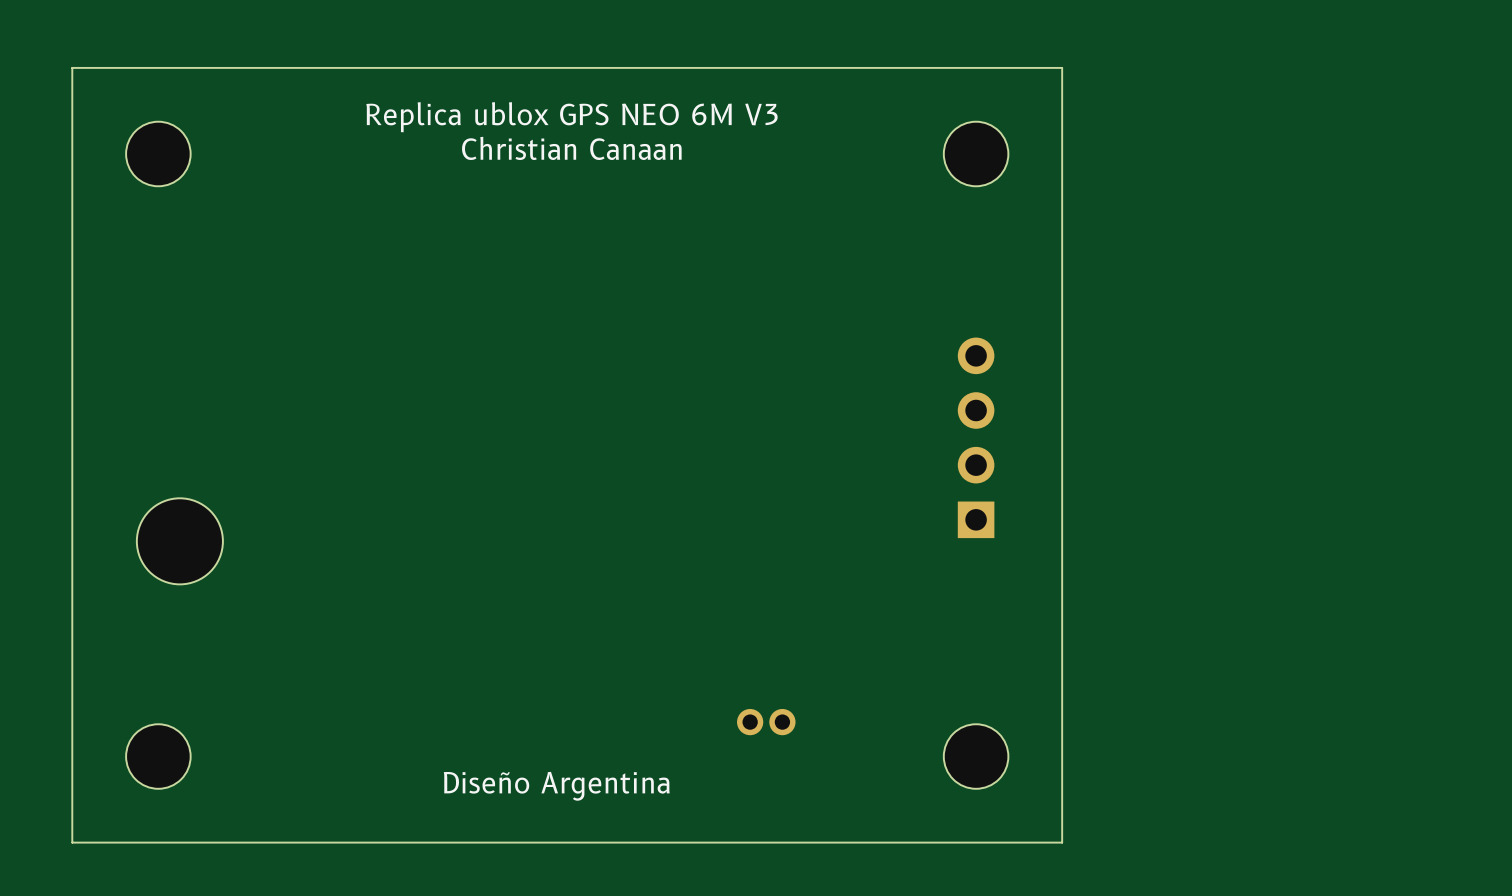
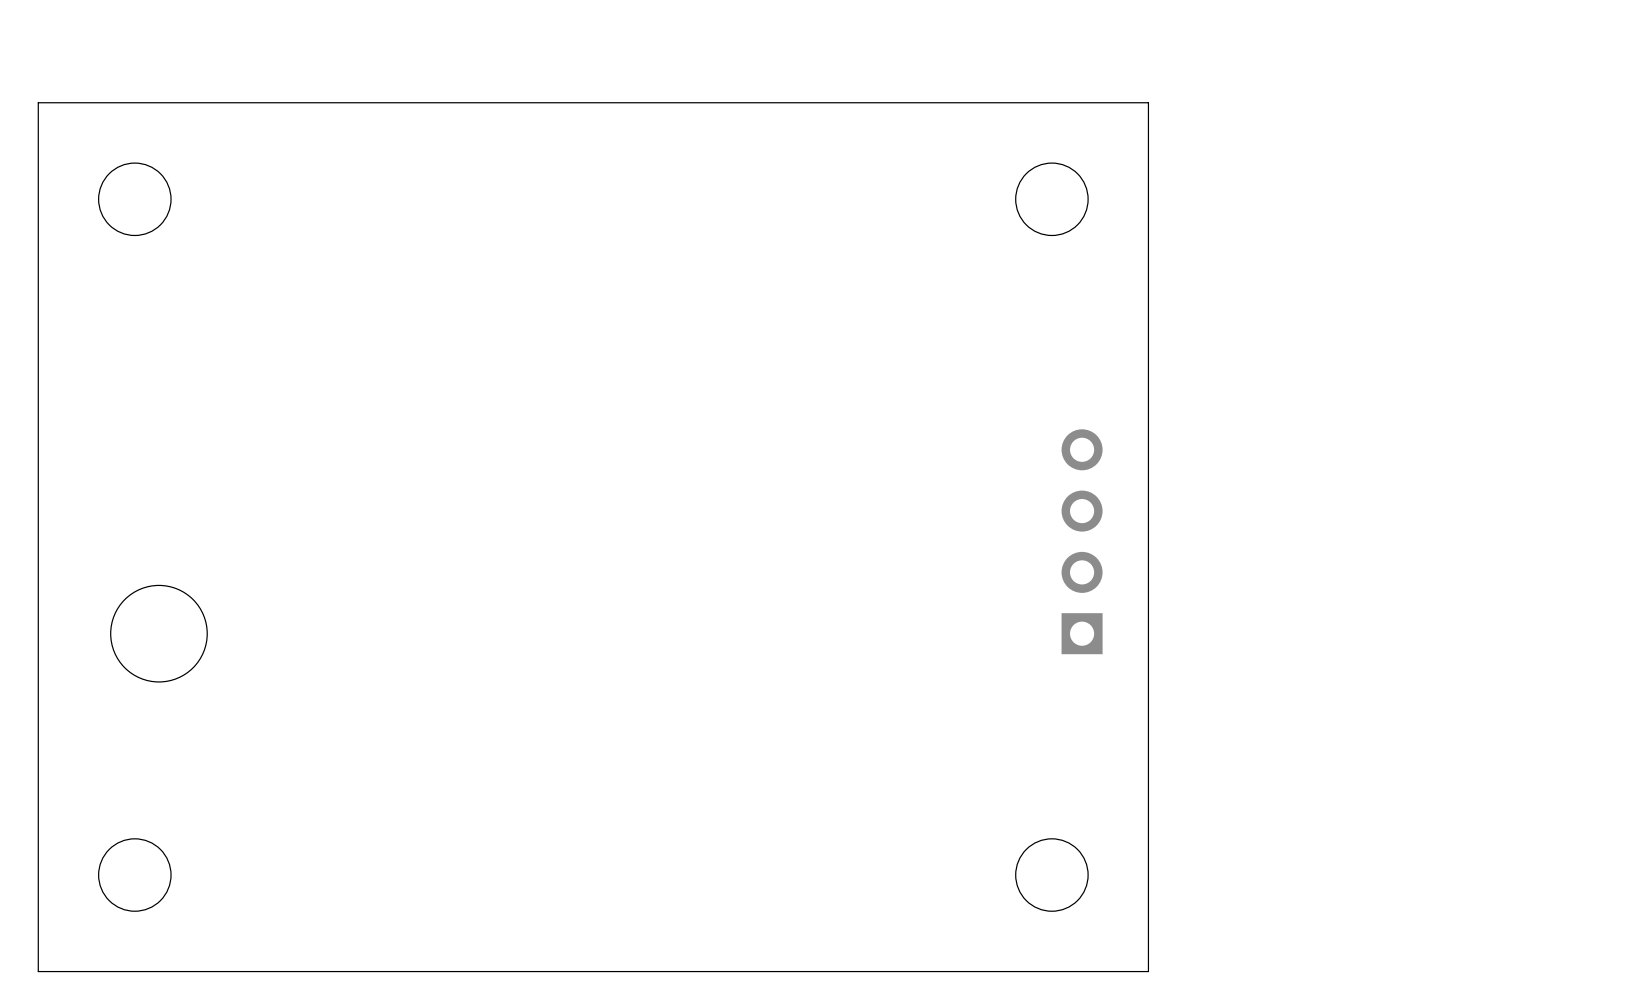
text: Replica ublox GPS NEO 6M V3 (571, 117) -> none
text: Christian Canaan (571, 148) -> none
part position: (976, 437) -> (1082, 541)
part: (766, 722) -> none
text: Diseño Argentina (556, 786) -> none

